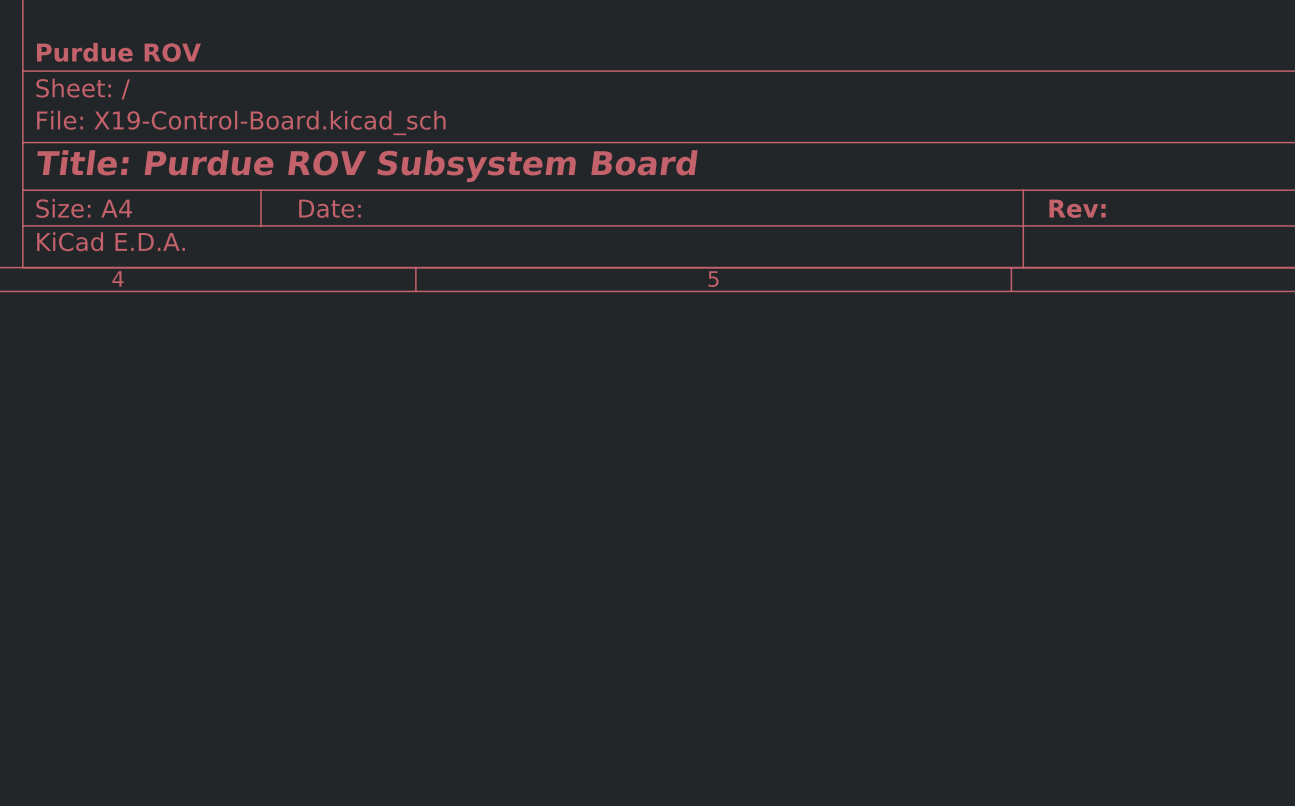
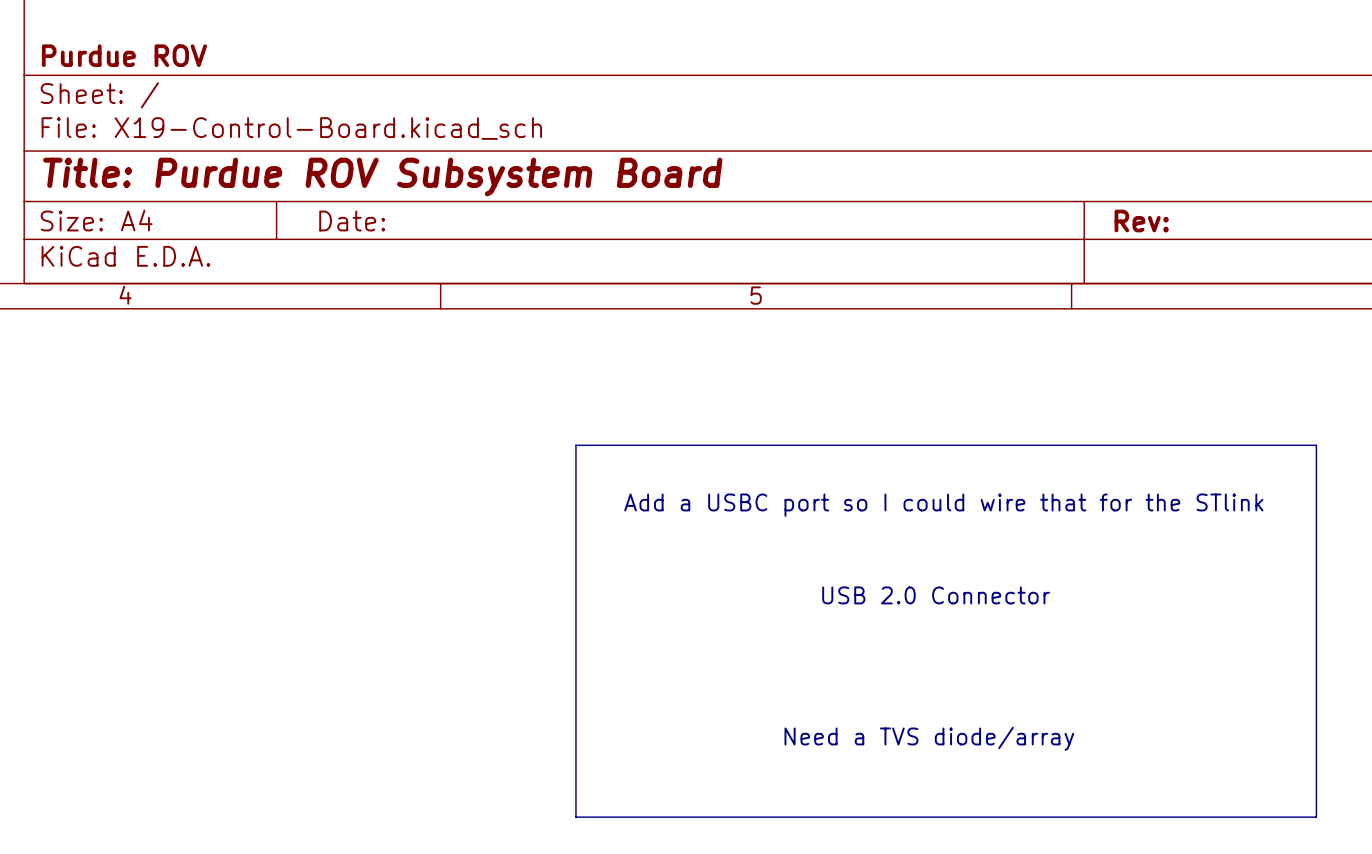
line: none -> (575, 445) (1316, 445) (1316, 817) (575, 817) (575, 445)
text: none -> Add a USBC port so I could wire that for the STlink (943, 505)
text: none -> USB 2.0 Connector (936, 595)
text: none -> Need a TVS diode/array (929, 738)

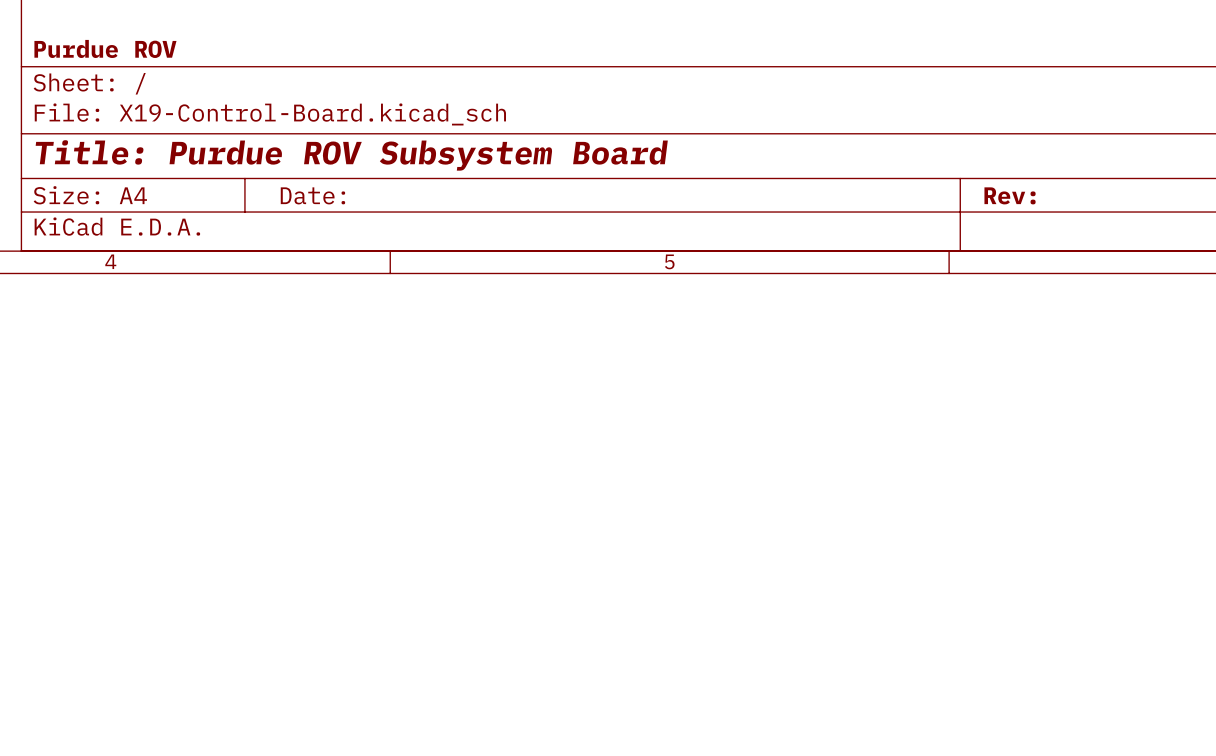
line: (575, 445) (1316, 445) (1316, 817) (575, 817) (575, 445) -> none
text: Add a USBC port so I could wire that for the STlink (943, 505) -> none
text: USB 2.0 Connector (936, 595) -> none
text: Need a TVS diode/array (929, 738) -> none

